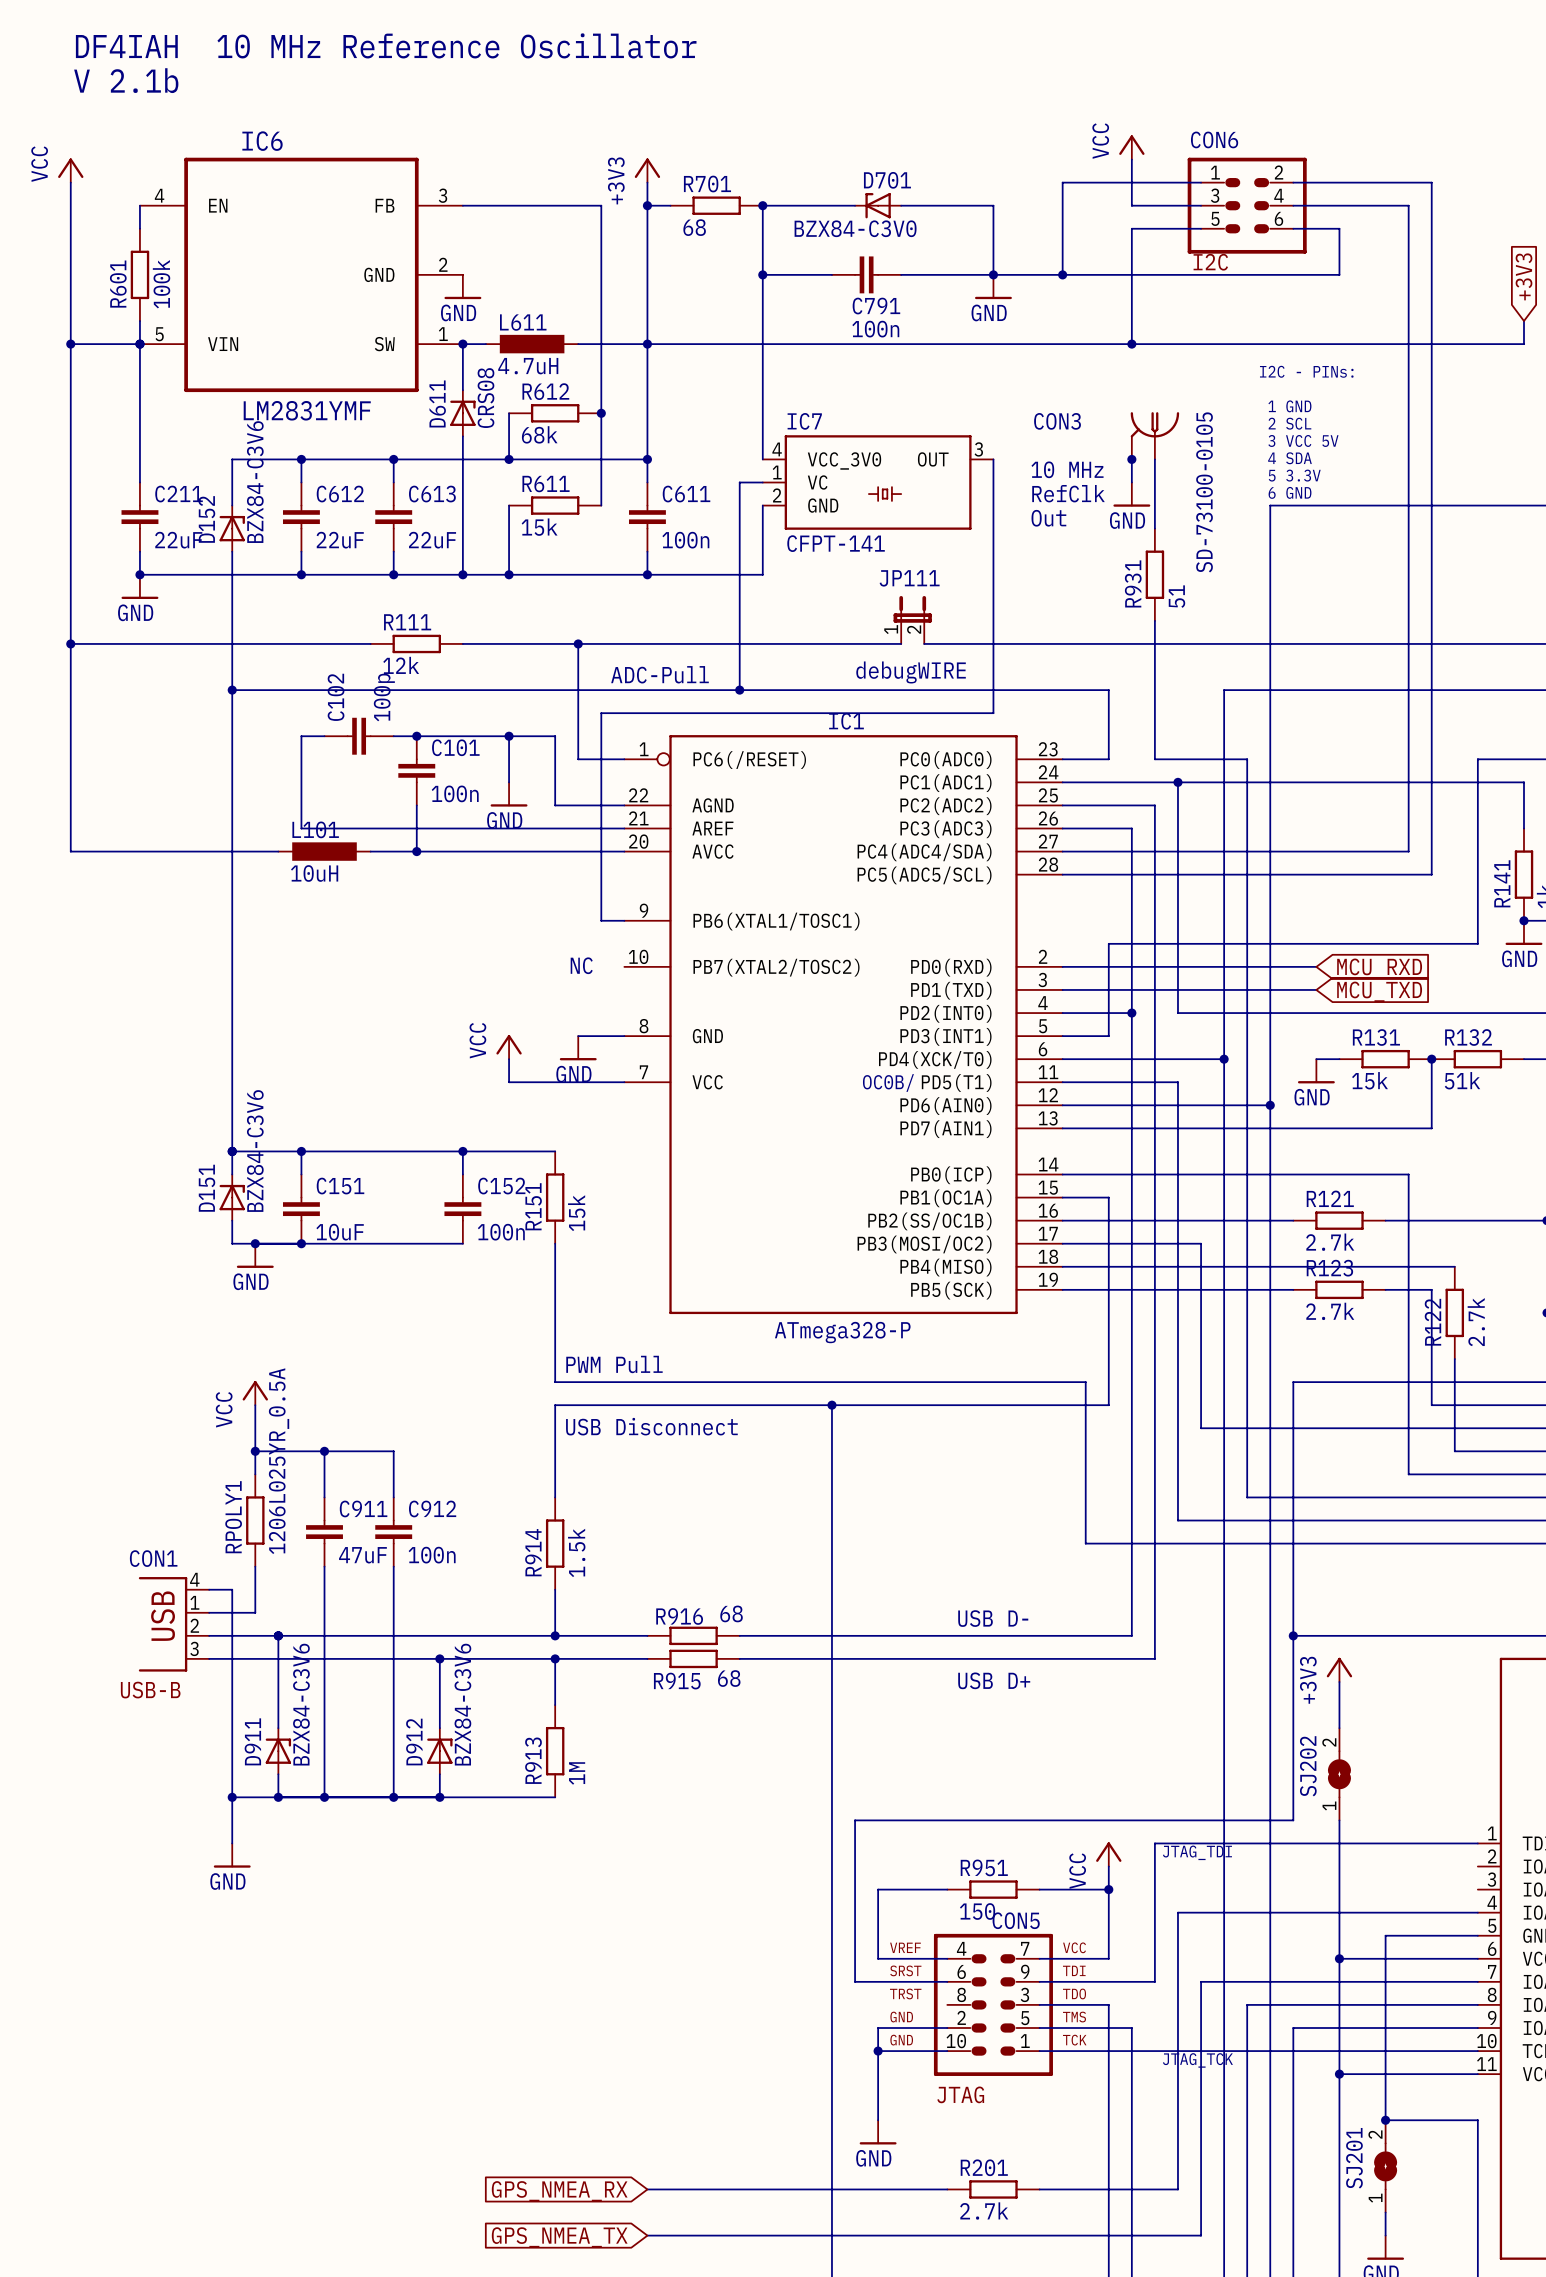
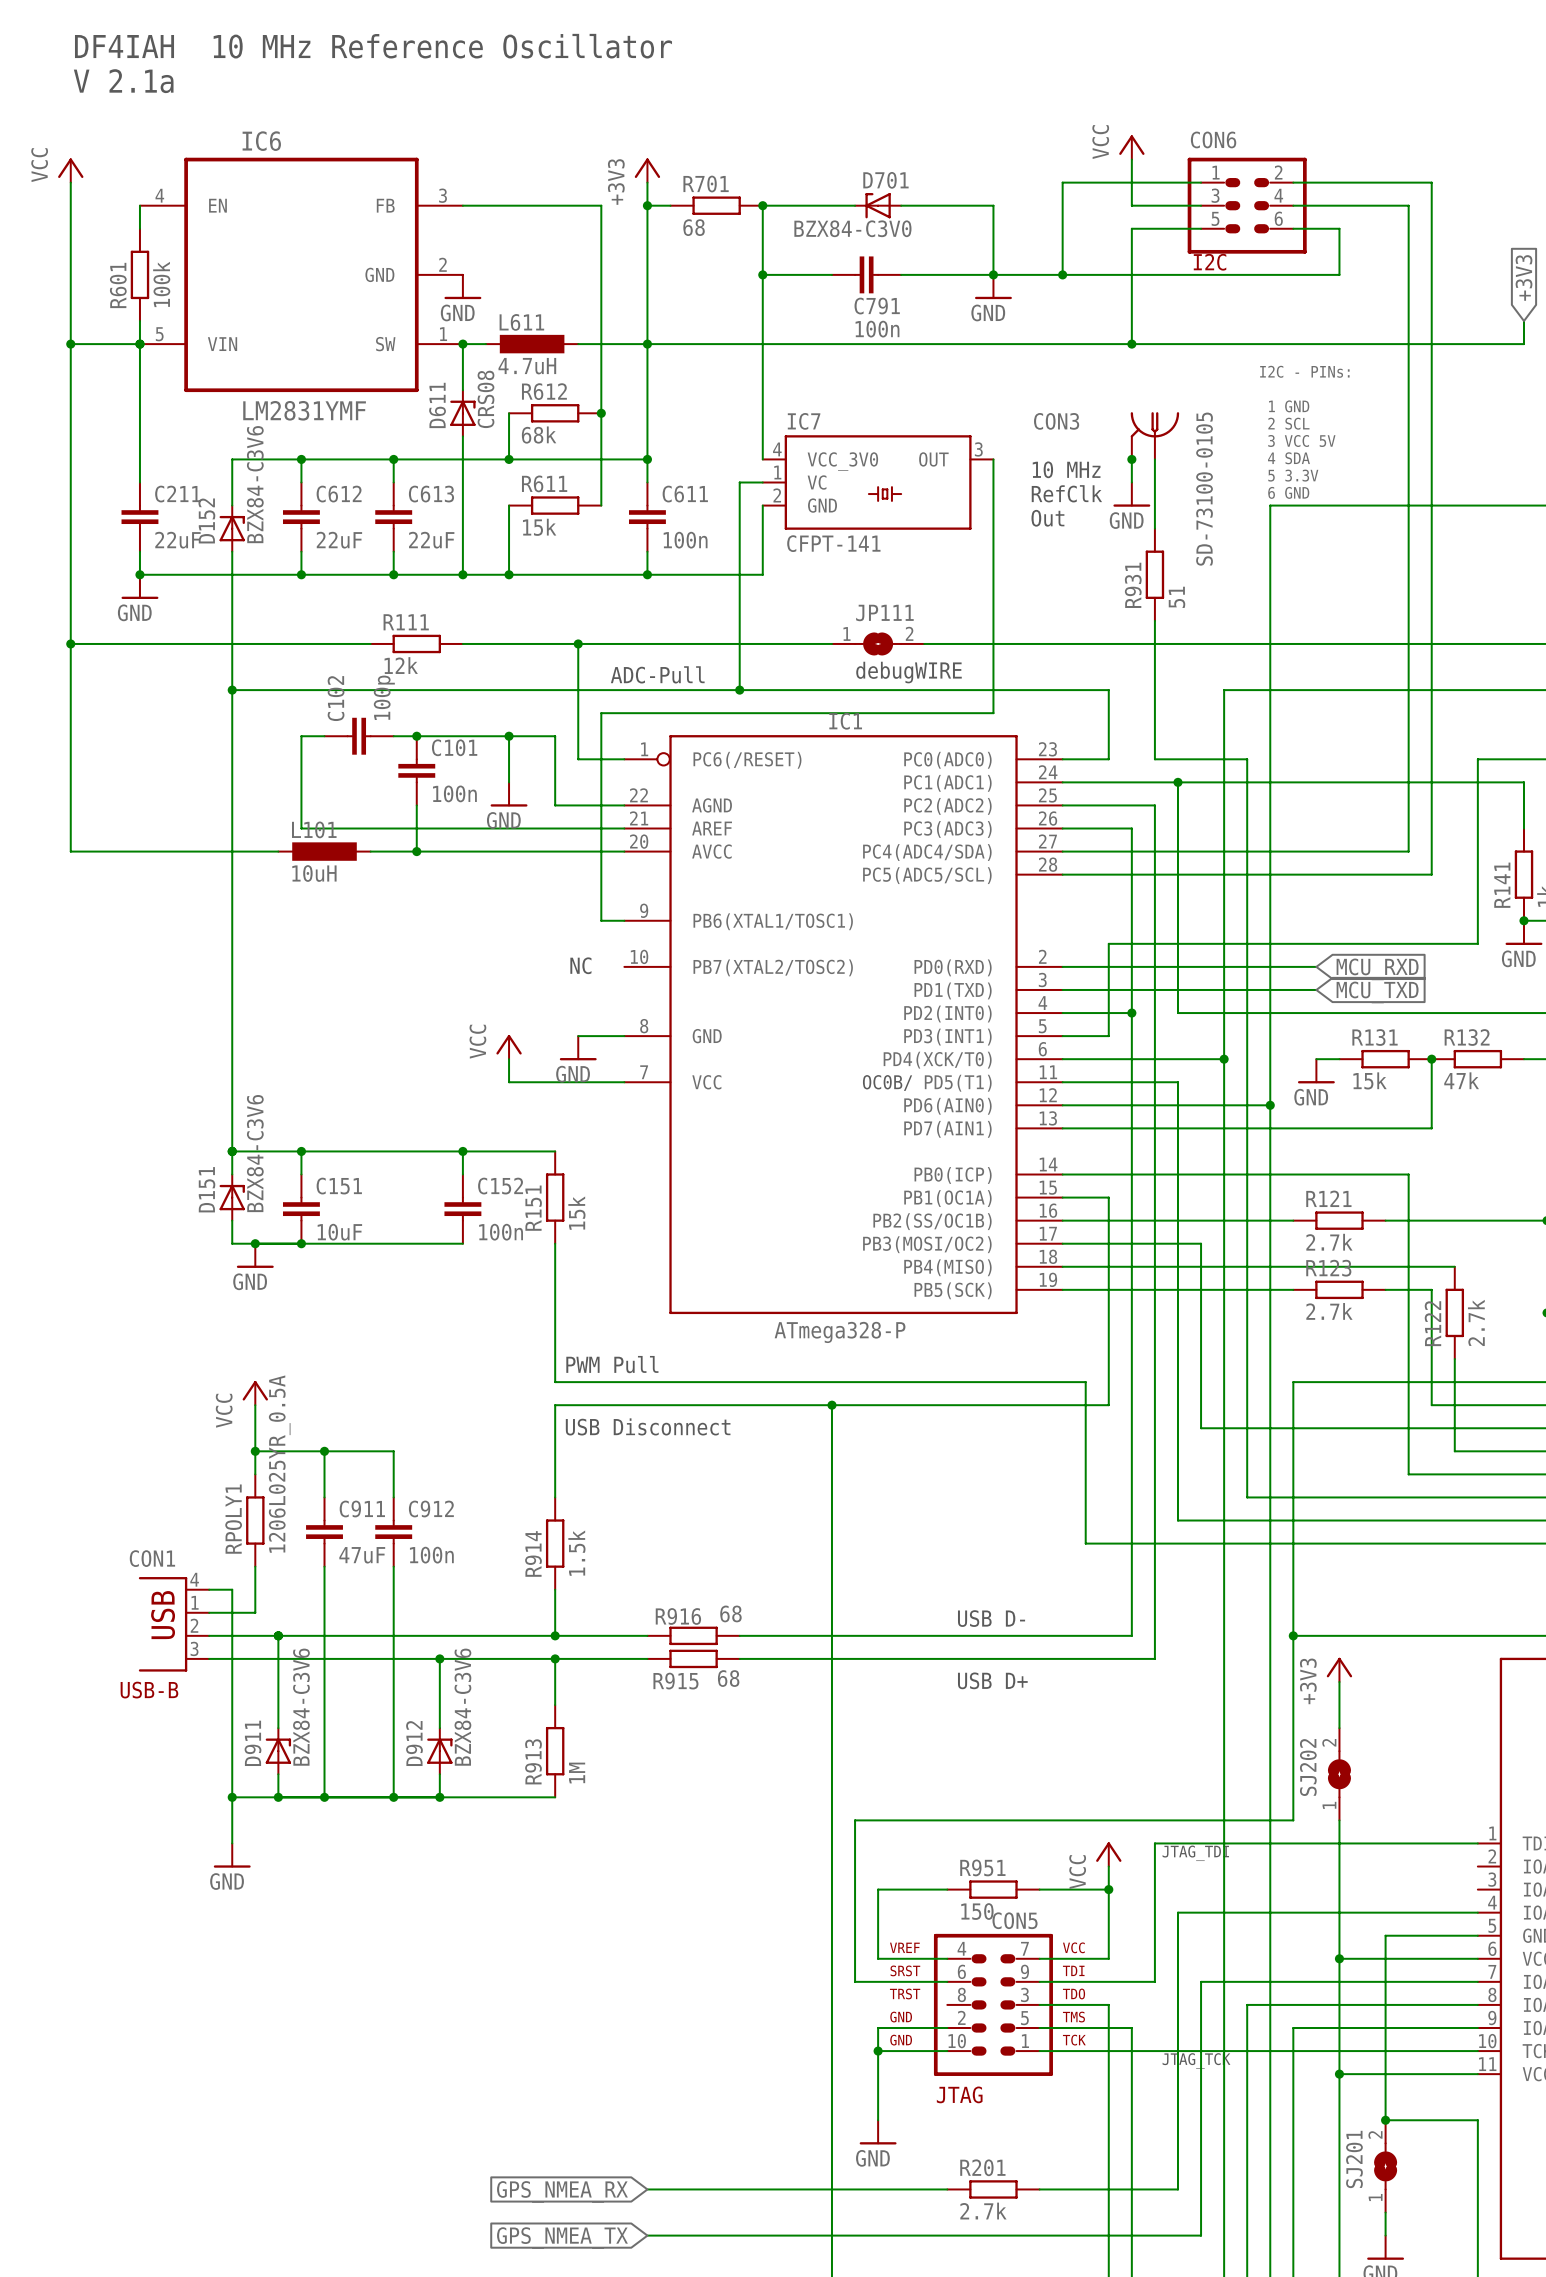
text: V 2.1b (126, 80) -> V 2.1a (123, 81)
JP111 symbol: [893, 595, 932, 644] -> [831, 632, 925, 656]
R132 value: 51k (1462, 1080) -> 47k (1461, 1080)

